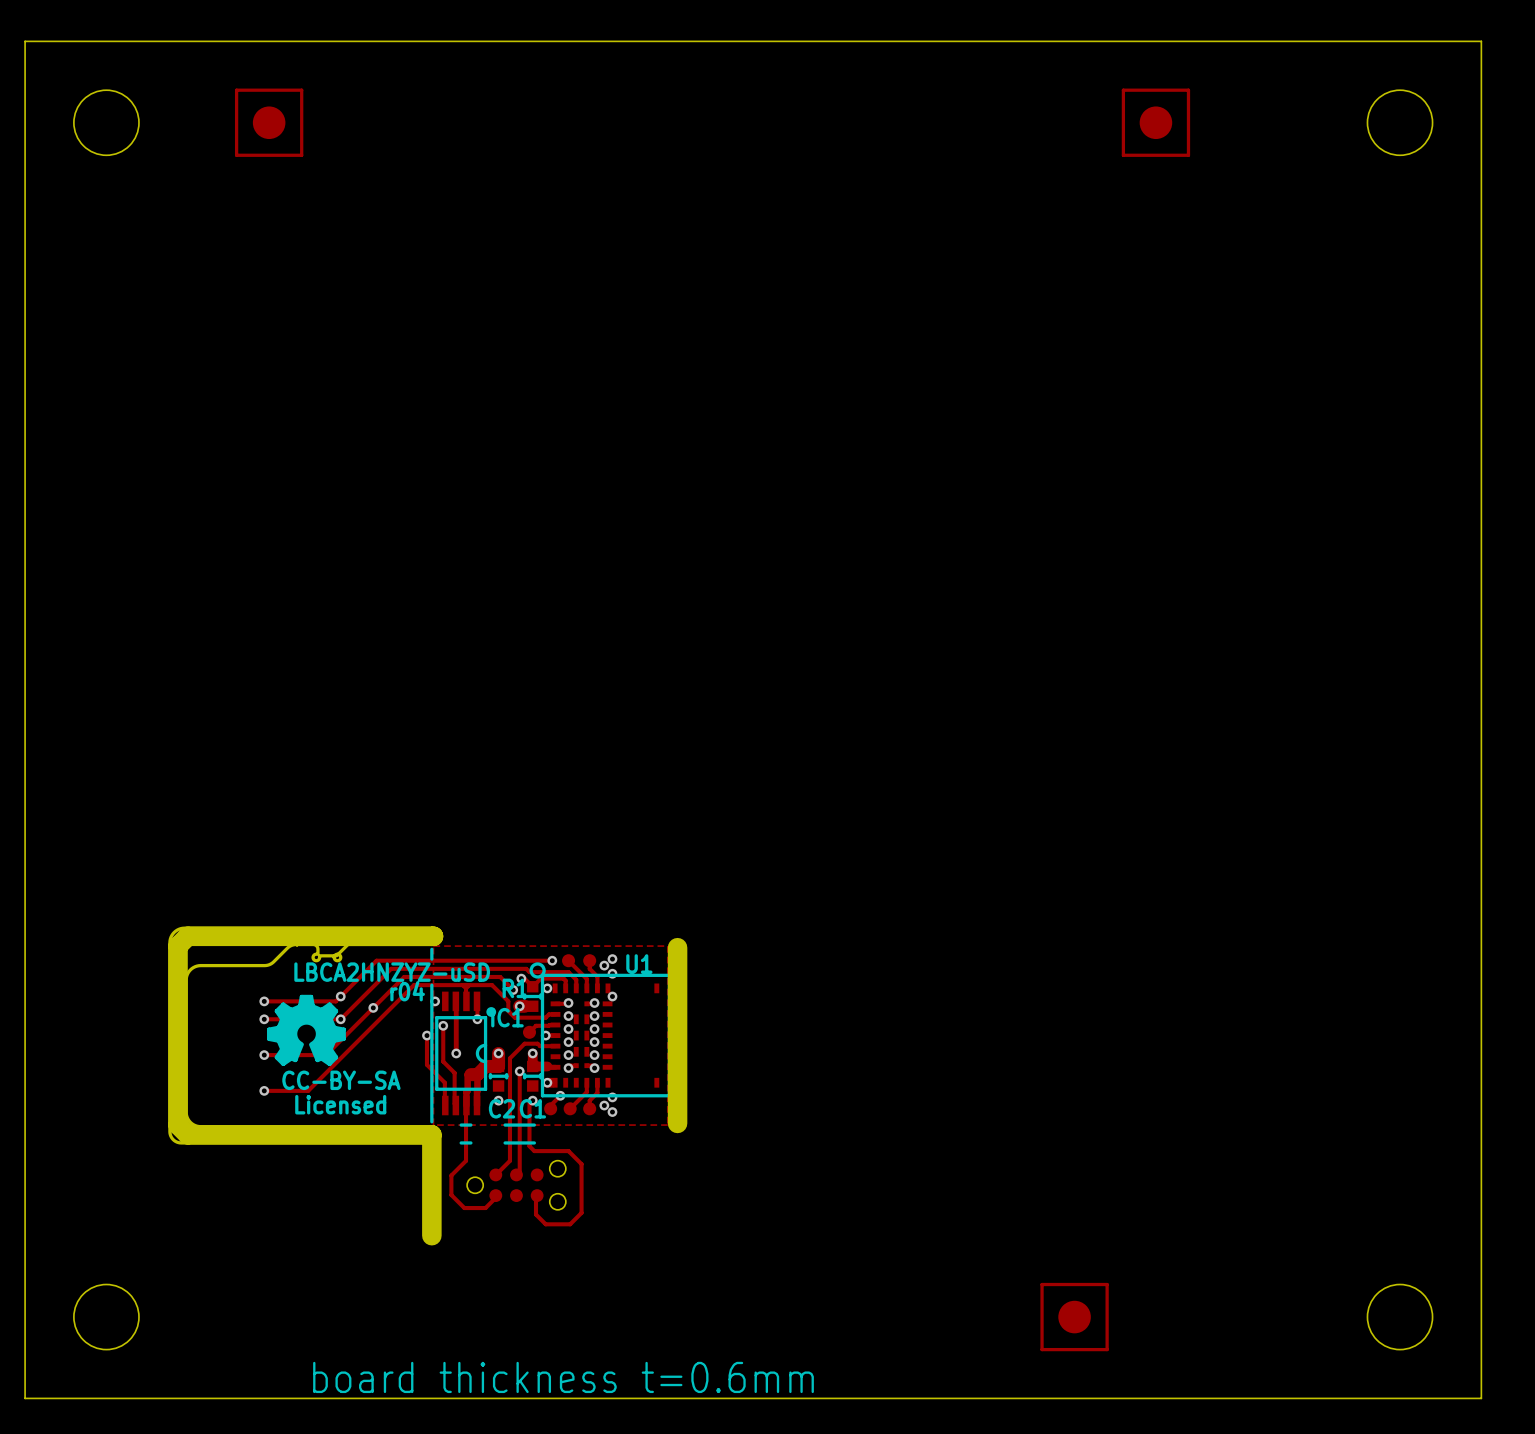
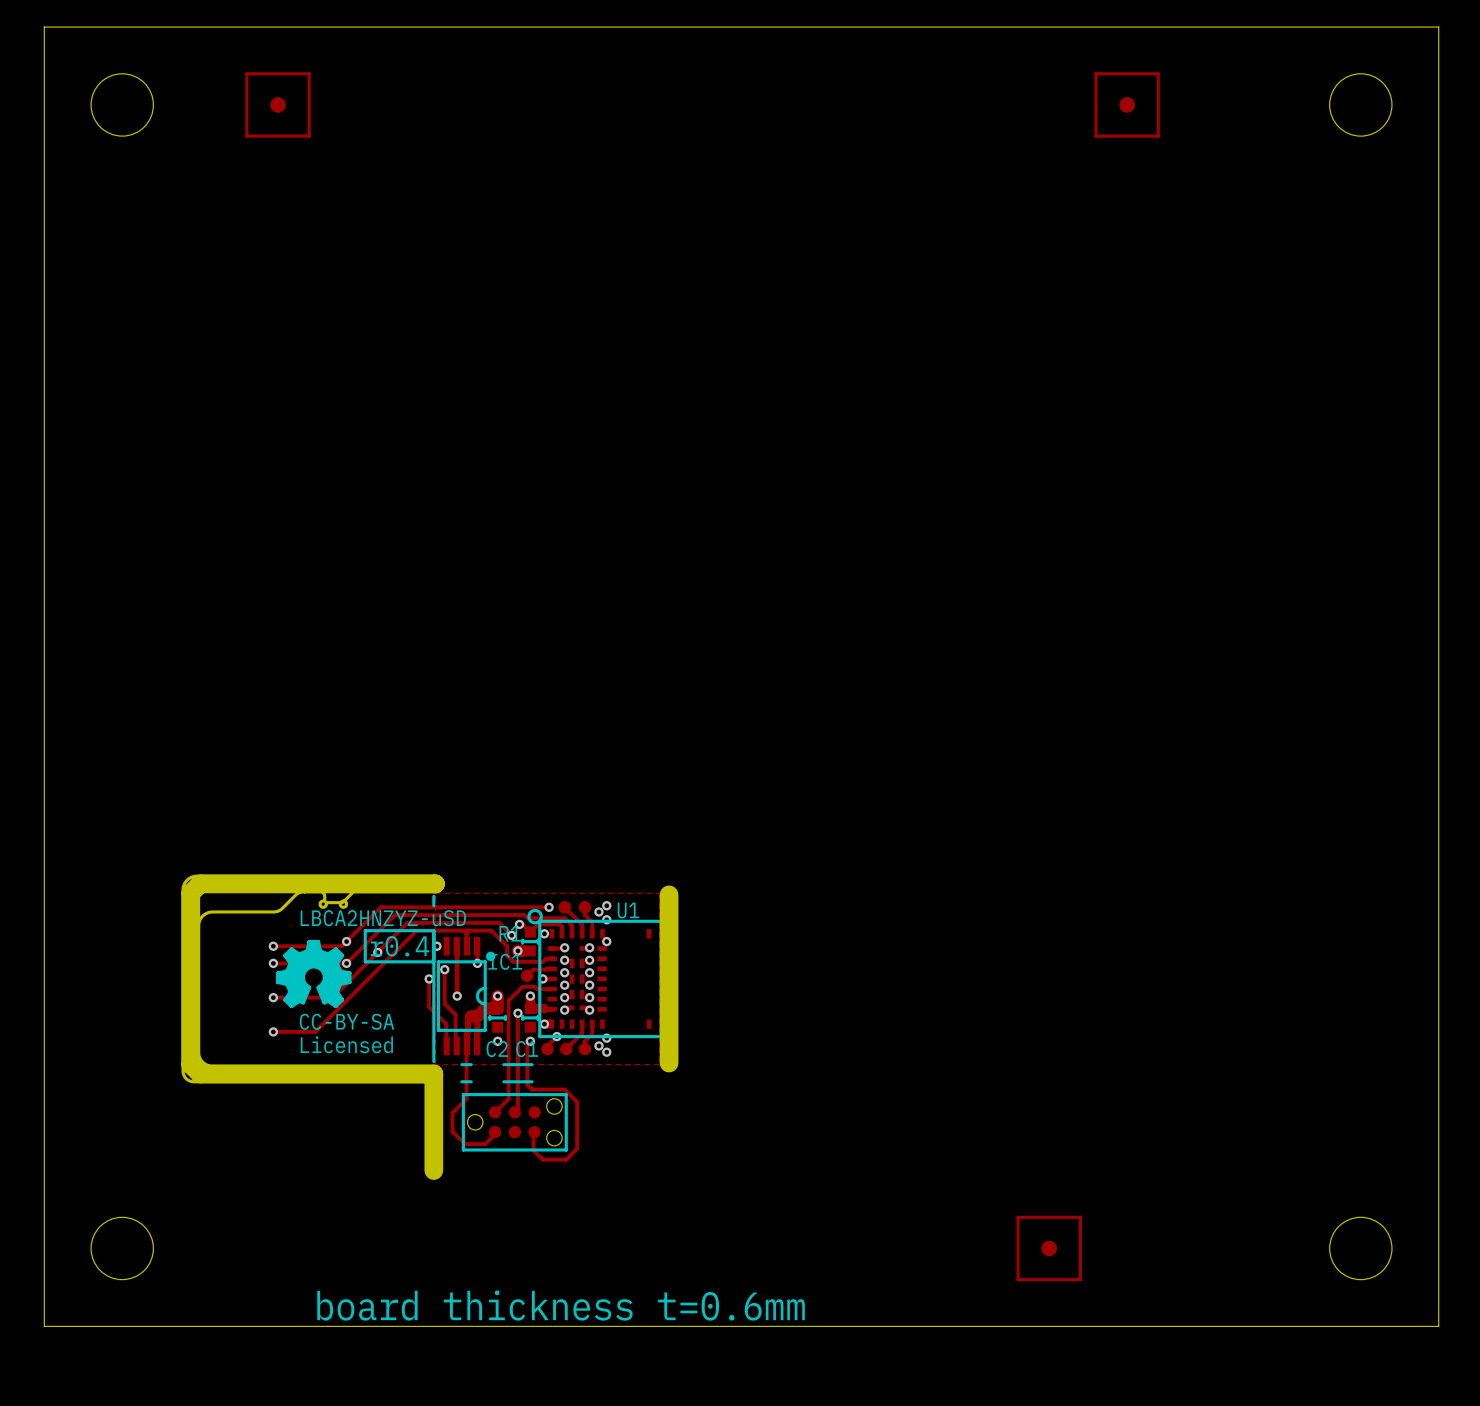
part footprint: [234, 88, 304, 157] -> [245, 72, 311, 138]
part footprint: [1121, 88, 1191, 157] -> [1094, 72, 1160, 138]
drawing: none -> [363, 929, 436, 964]
text: r04 (407, 991) -> none
part footprint: [467, 1160, 566, 1210] -> [461, 1093, 568, 1152]
part footprint: [1040, 1282, 1109, 1352] -> [1016, 1215, 1082, 1282]

